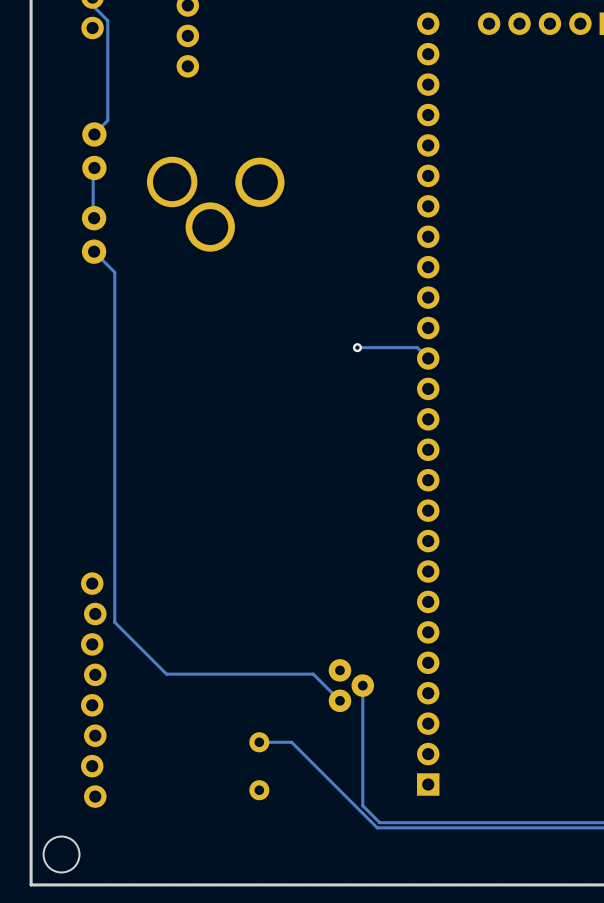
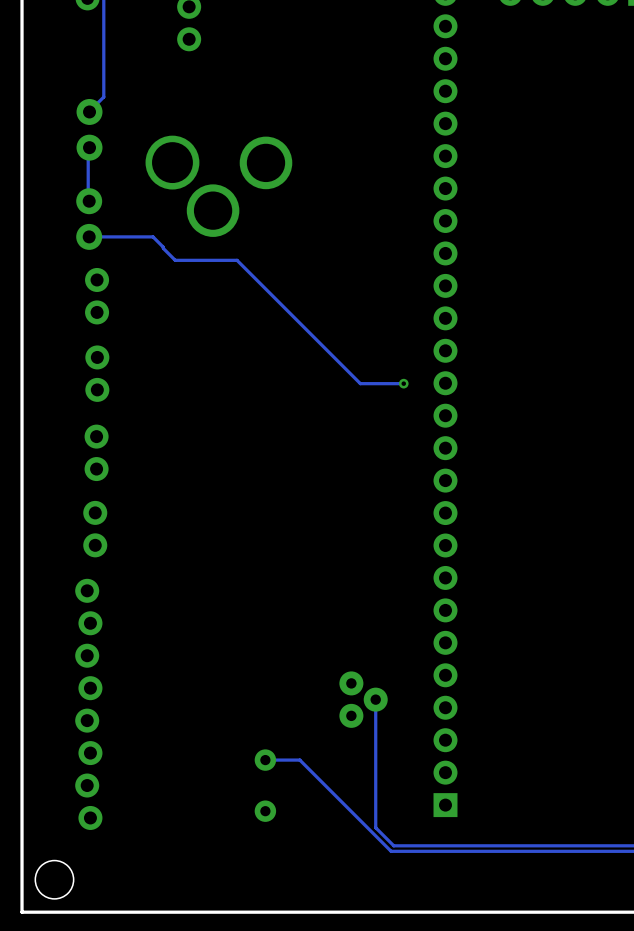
track: (94, 251) (114, 272) (114, 622) (166, 674) (313, 674) (339, 700) -> (89, 236) (153, 236) (175, 260) (237, 260) (360, 383) (403, 383)
part: none -> (97, 296)
track: (357, 347) (417, 347) (428, 358) -> none
via position: (357, 347) -> (403, 383)
part: none -> (97, 373)
part: none -> (96, 452)
part: none -> (95, 529)

